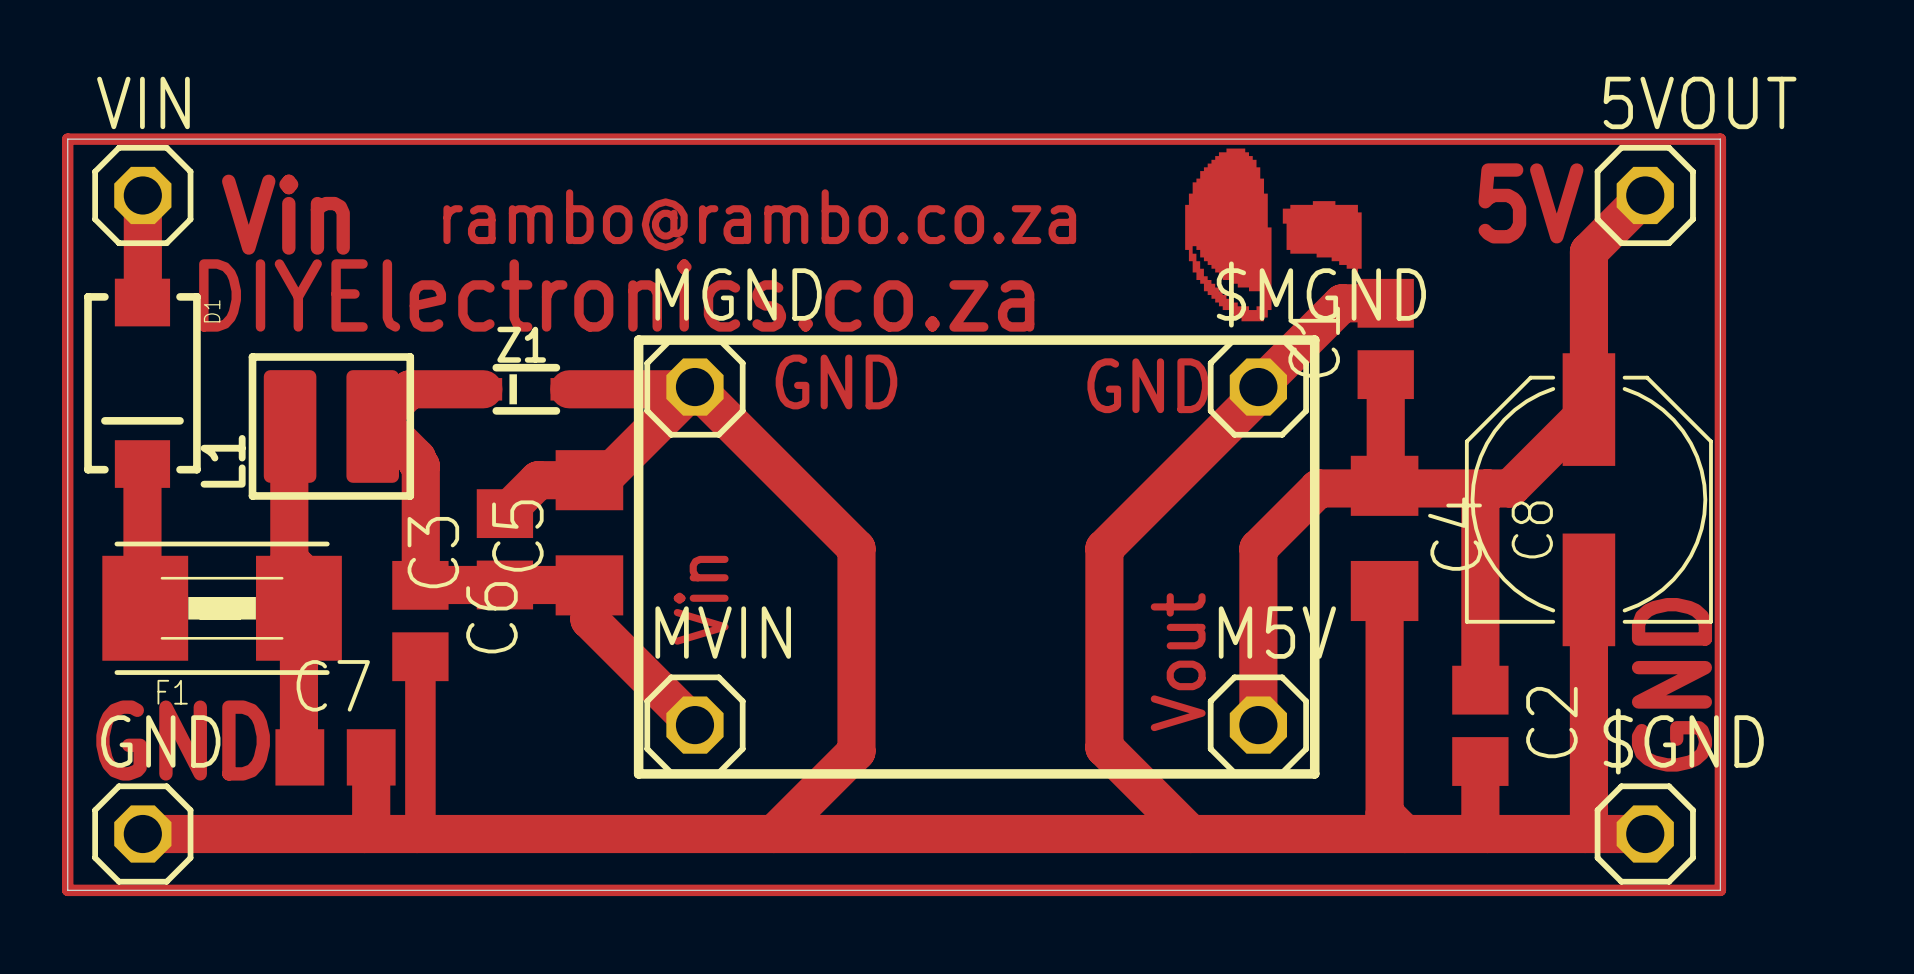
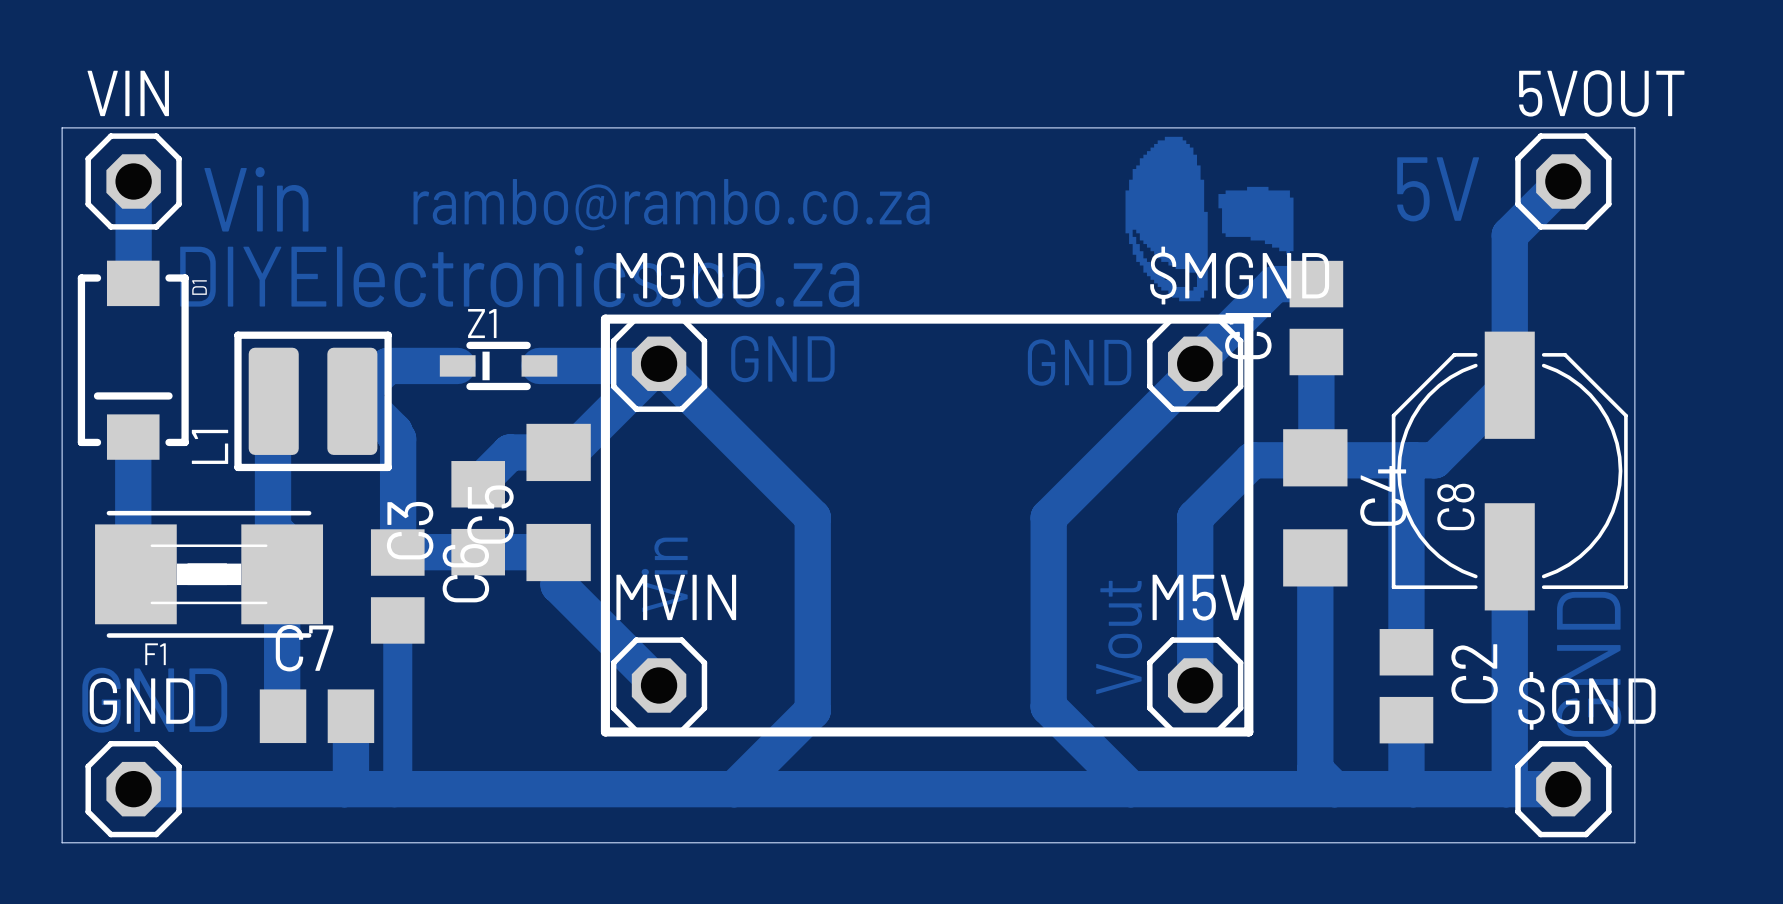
track: (67, 139) (67, 890) (1720, 890) (1720, 139) (67, 139) -> none

